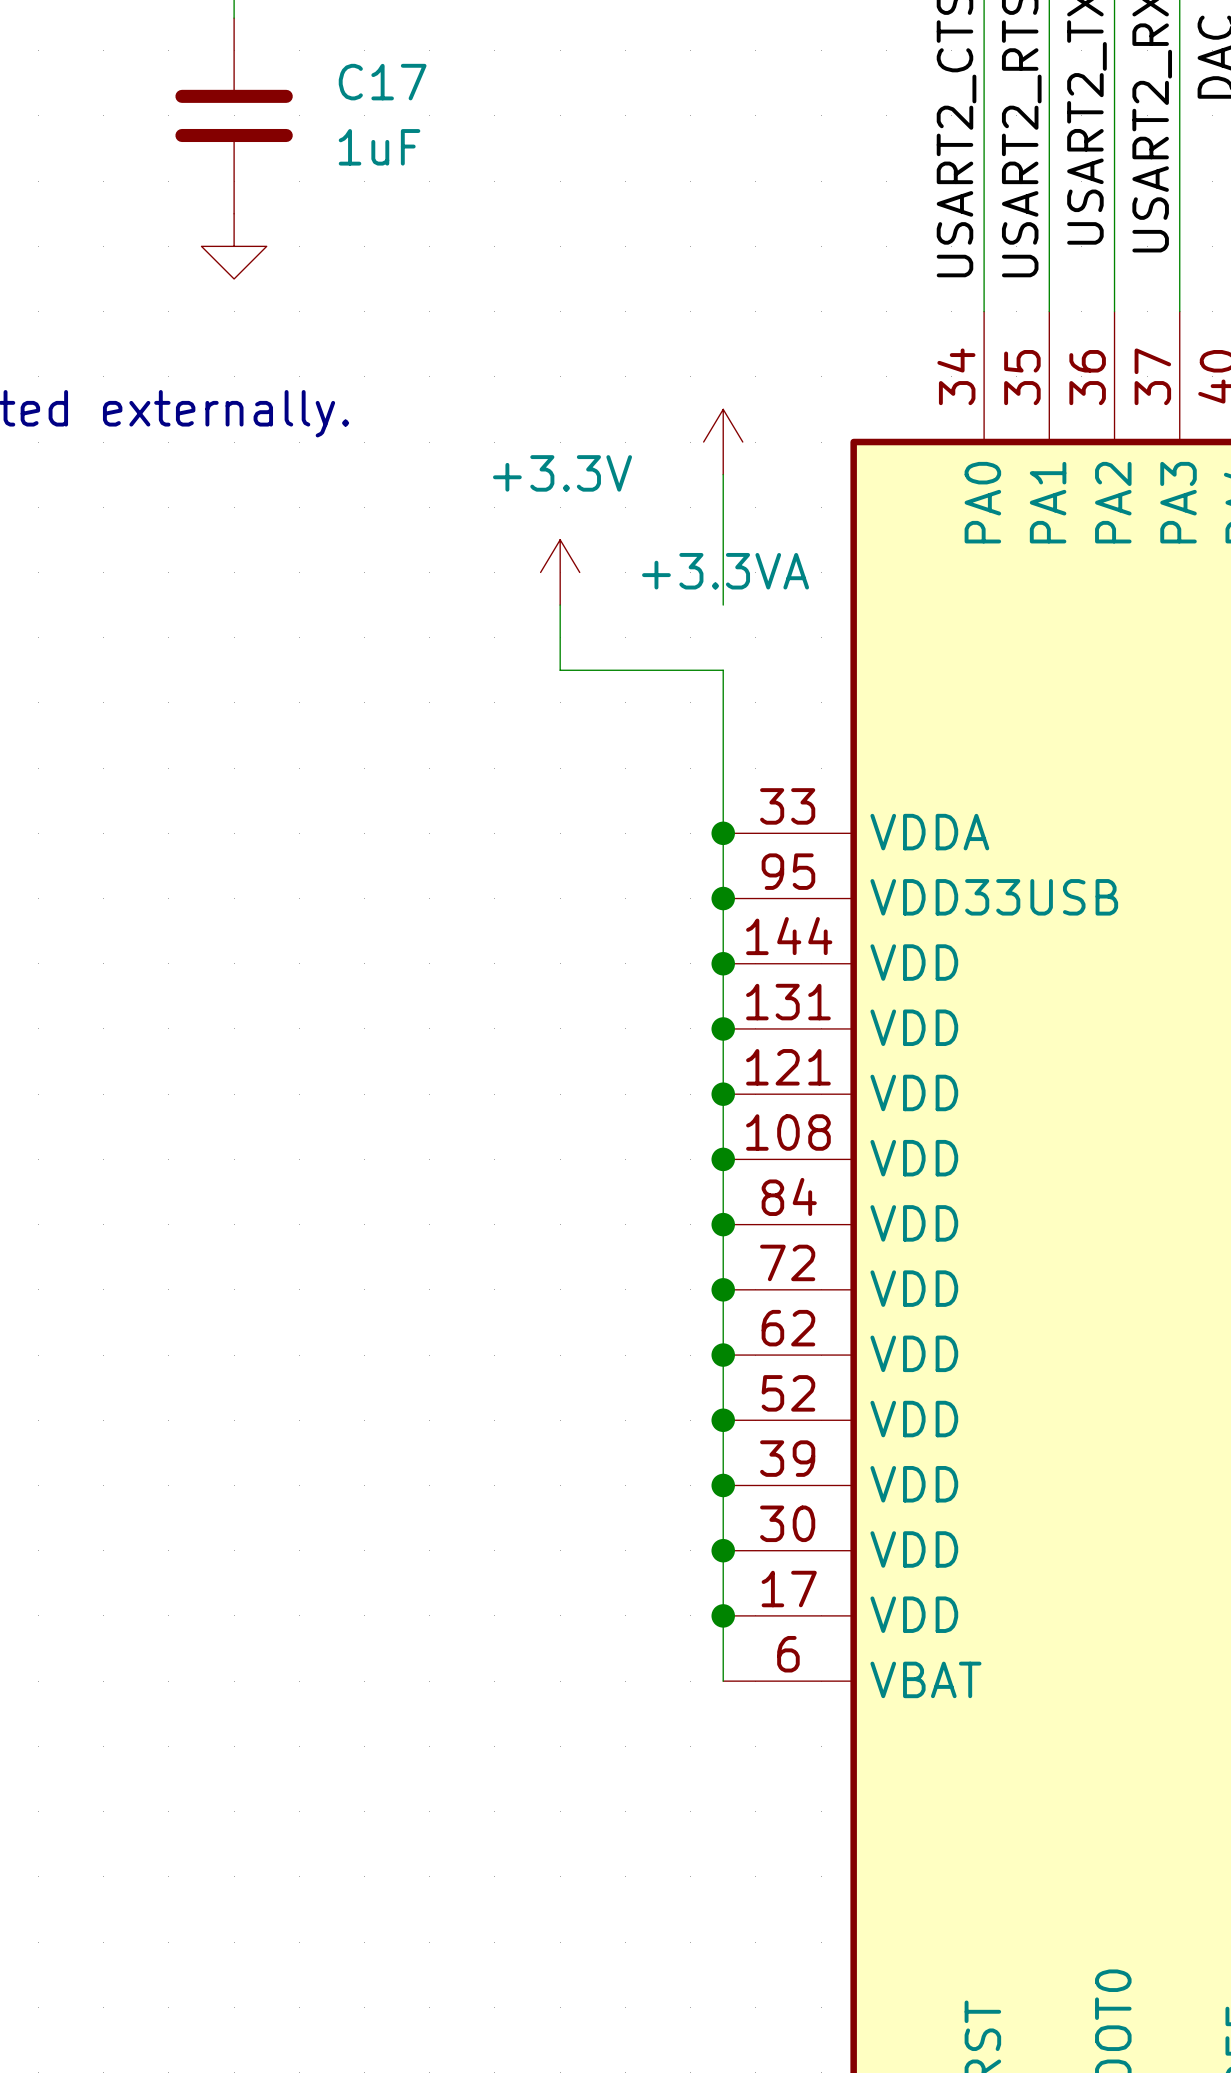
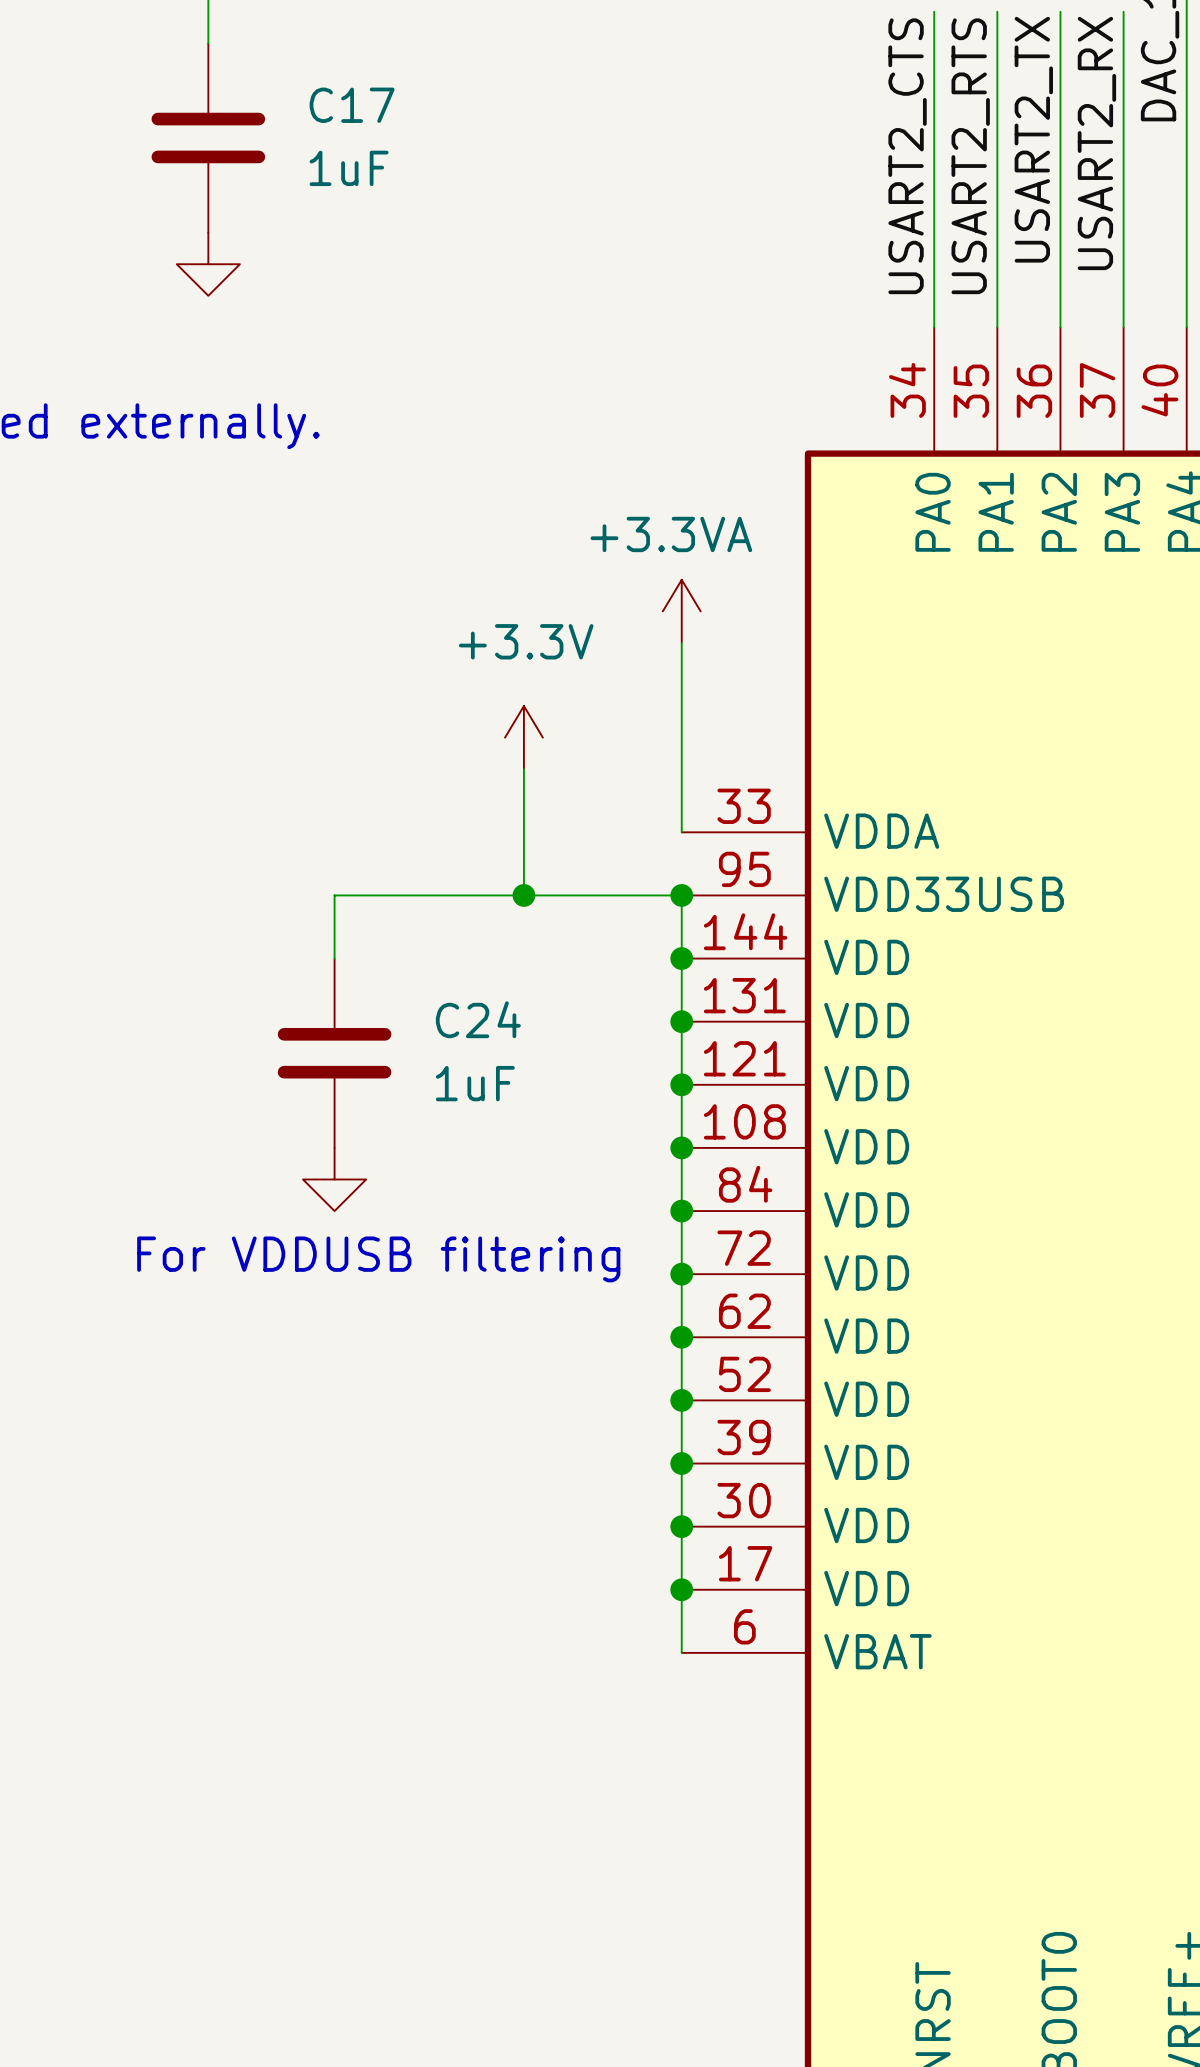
power symbol position: +3.3VA (723, 442) -> +3.3VA (681, 611)
wire: (723, 474) (723, 605) -> (523, 769) (523, 895)
power symbol text position: +3.3VA (725, 571) -> +3.3VA (671, 534)
power symbol position: +3.3V (560, 572) -> +3.3V (523, 737)
wire: (560, 605) (560, 670) (723, 670) -> (681, 642) (681, 674)
wire: (723, 833) (723, 898) -> (334, 958) (334, 895) (681, 895)
junction: (723, 833) -> none
junction: none -> (523, 895)
C24: none -> 1uF (334, 1053)
power symbol: none -> (334, 1179)
text: none -> For VDDUSB filtering (378, 1259)

